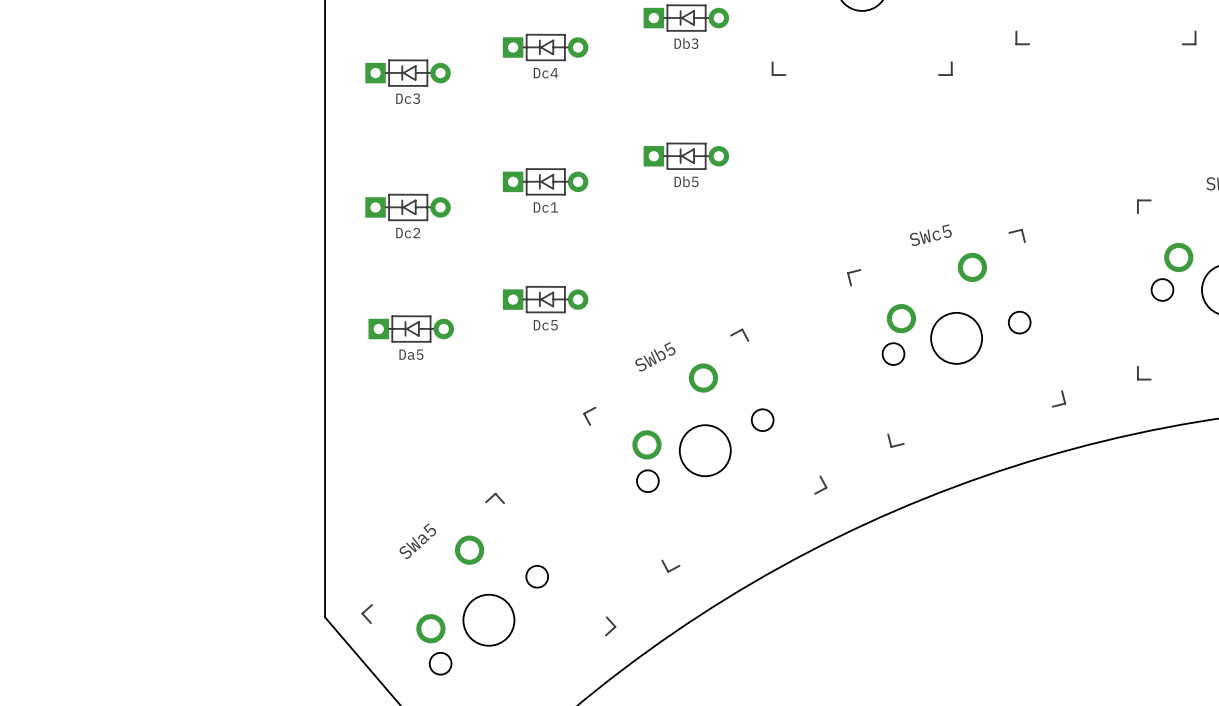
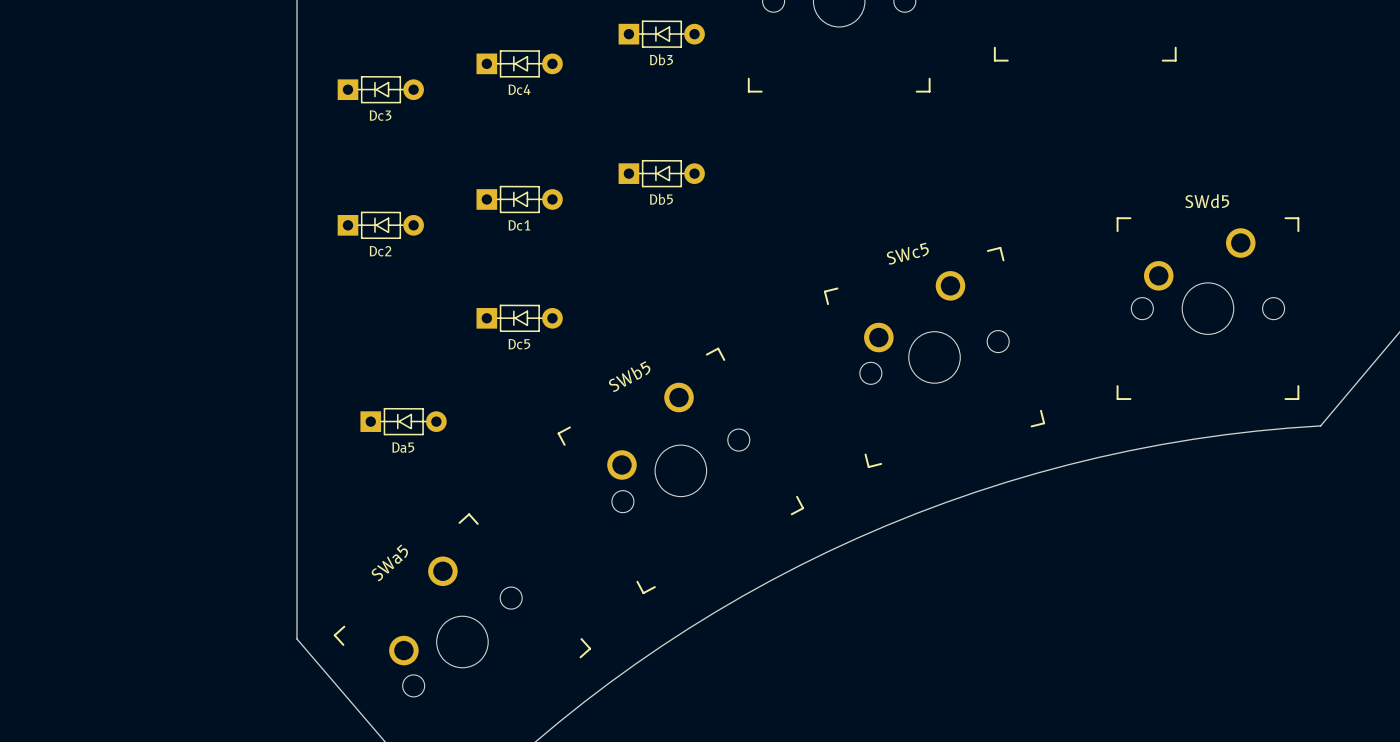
Da5 position: (411, 329) -> (403, 421)

